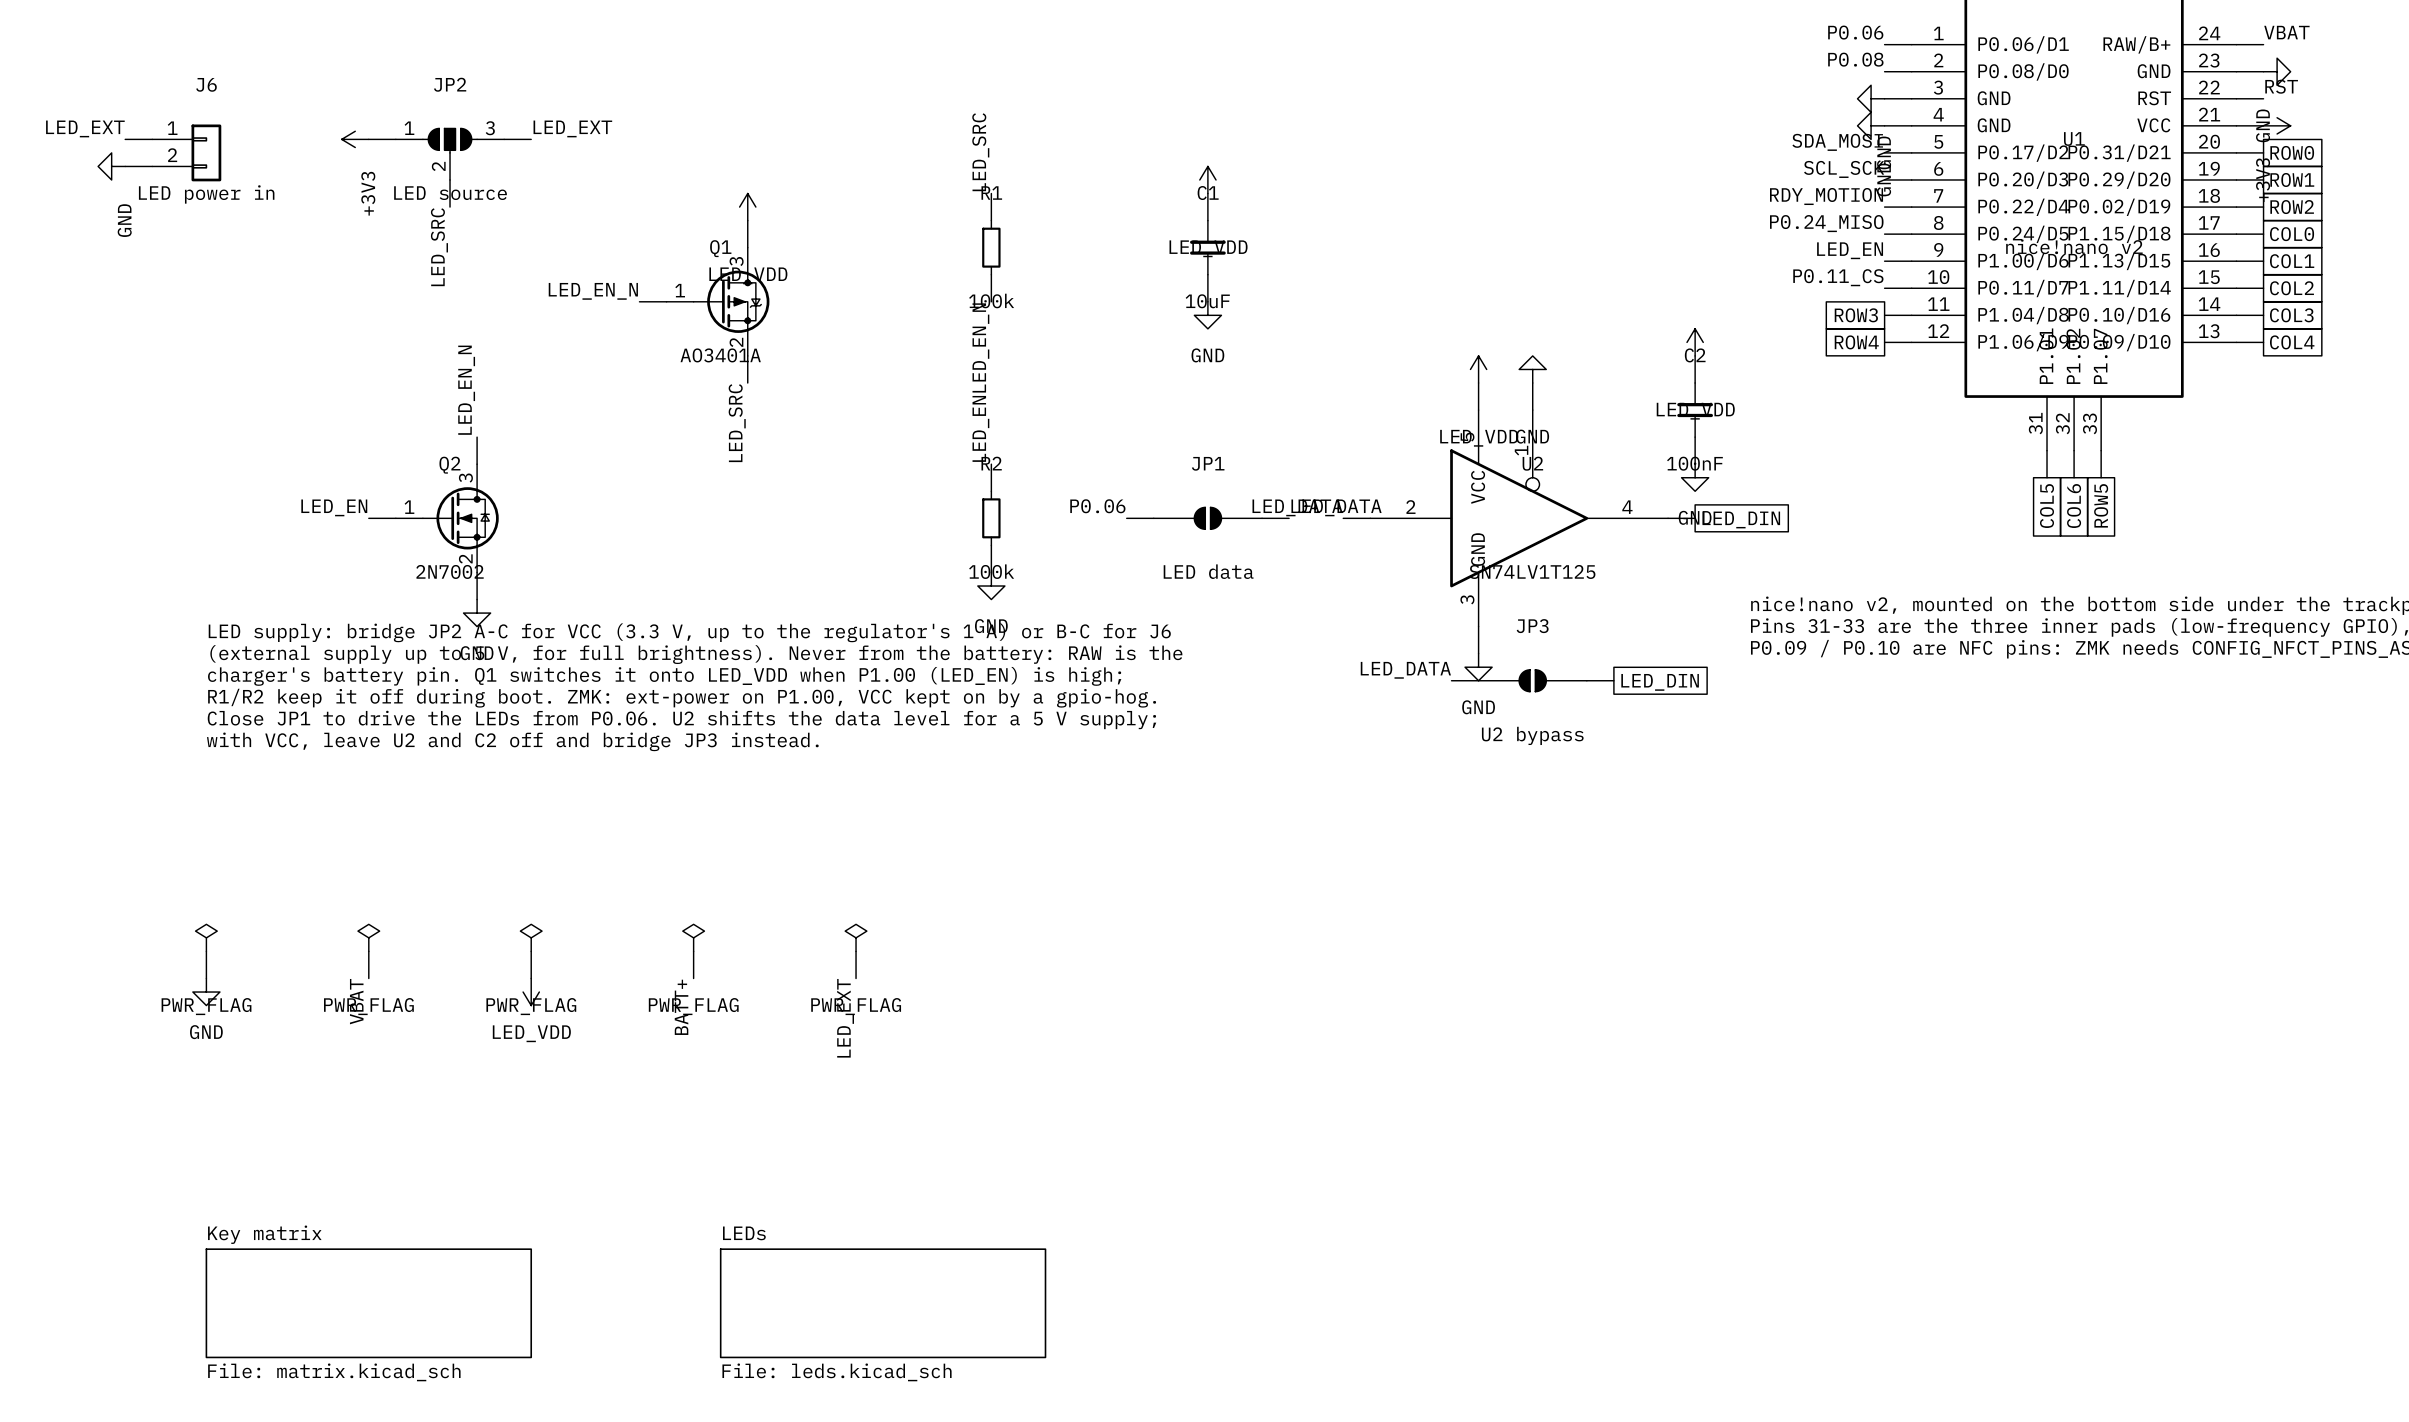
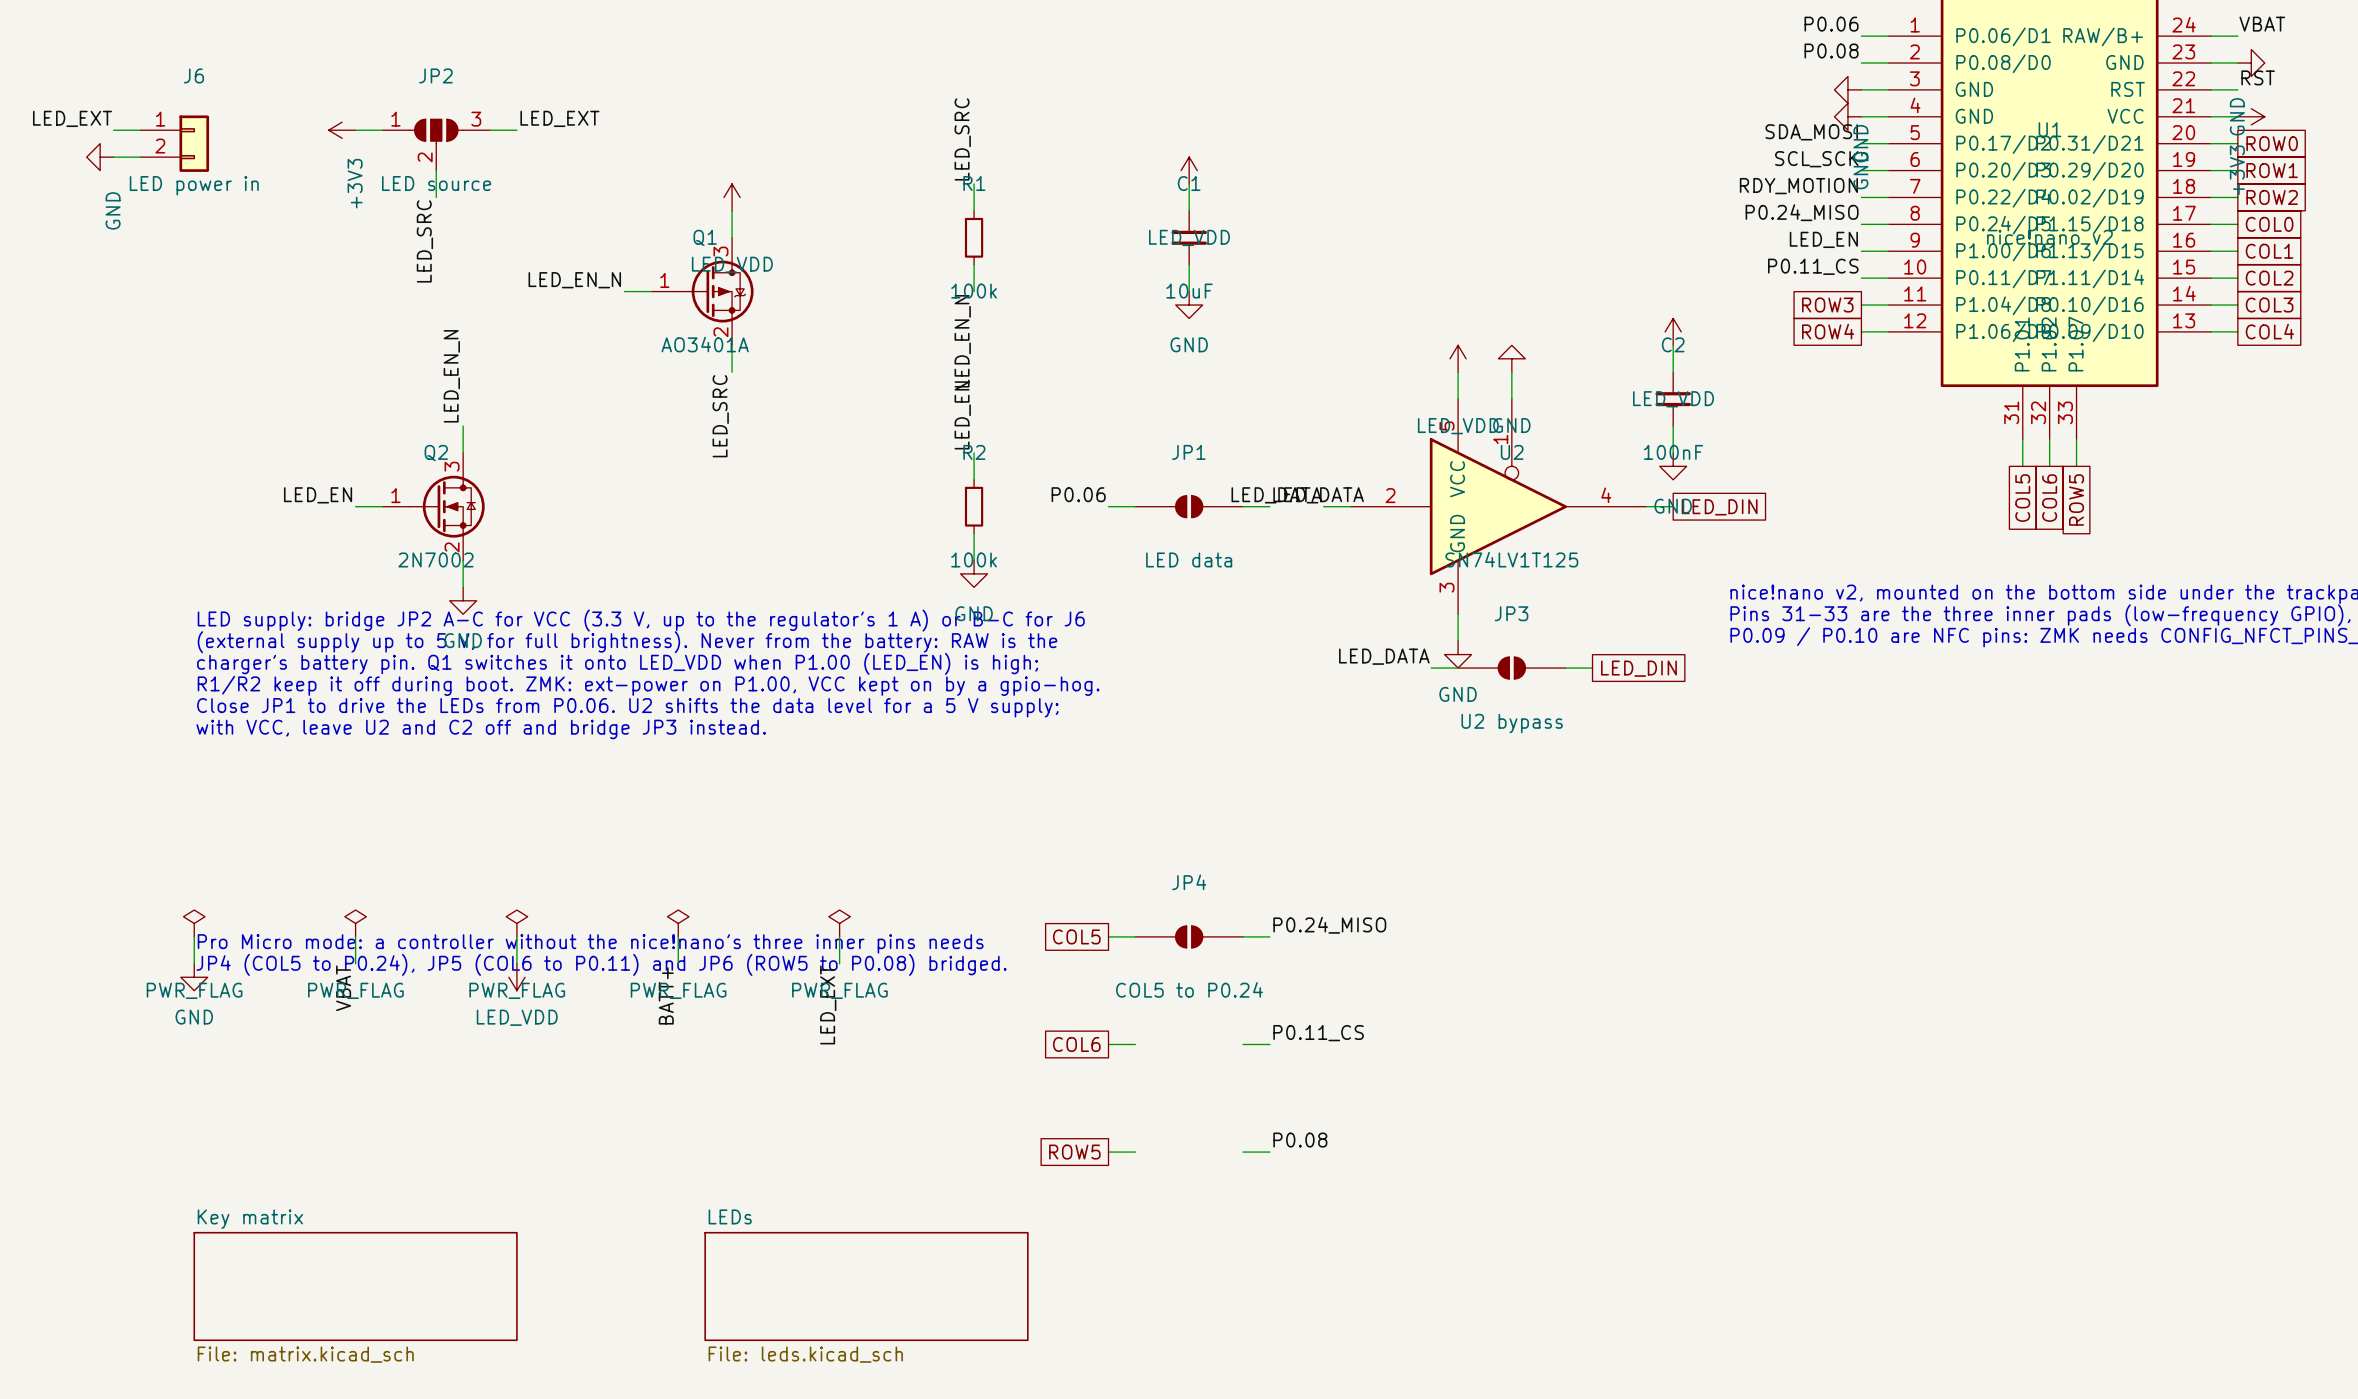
label: none -> P0.24_MISO (1329, 925)
global label: none -> COL5 (1076, 936)
wire: none -> (1108, 936) (1135, 936)
JP4: none -> COL5 to P0.24 (1189, 936)
wire: none -> (1242, 936) (1269, 936)
text: none -> Pro Micro mode: a controller without the nice!nano's three inner pins needs (590, 943)
text: none -> JP4 (COL5 to P0.24), JP5 (COL6 to P0.11) and JP6 (ROW5 to P0.08) bridged. (601, 964)
label: none -> P0.11_CS (1318, 1033)
global label: none -> COL6 (1076, 1044)
wire: none -> (1108, 1044) (1135, 1044)
wire: none -> (1242, 1044) (1269, 1044)
label: none -> P0.08 (1300, 1140)
global label: none -> ROW5 (1074, 1152)
wire: none -> (1108, 1152) (1135, 1152)
wire: none -> (1242, 1152) (1269, 1152)

